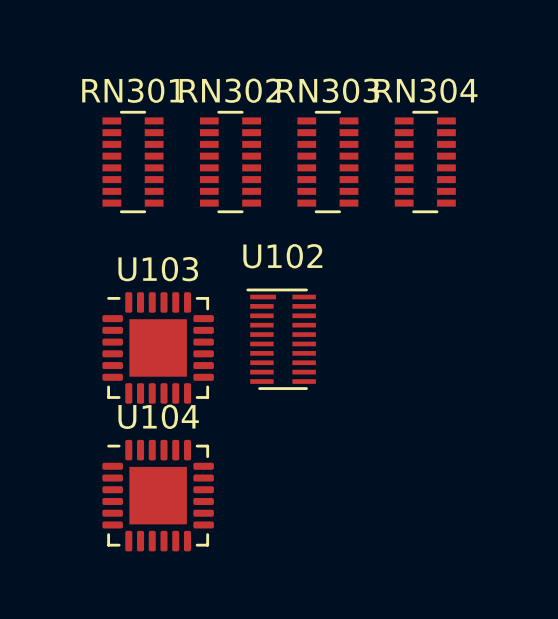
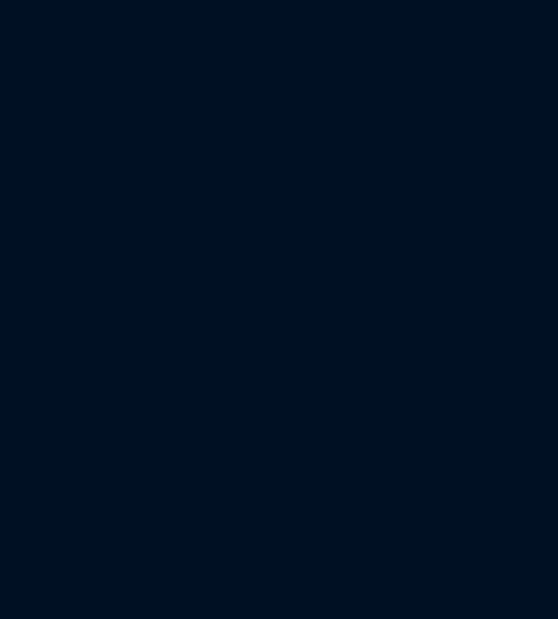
RN301: (133, 162) -> none
RN302: (230, 162) -> none
RN303: (327, 162) -> none
RN304: (425, 162) -> none
U102: (281, 339) -> none
U103: (158, 347) -> none
U104: (158, 495) -> none

